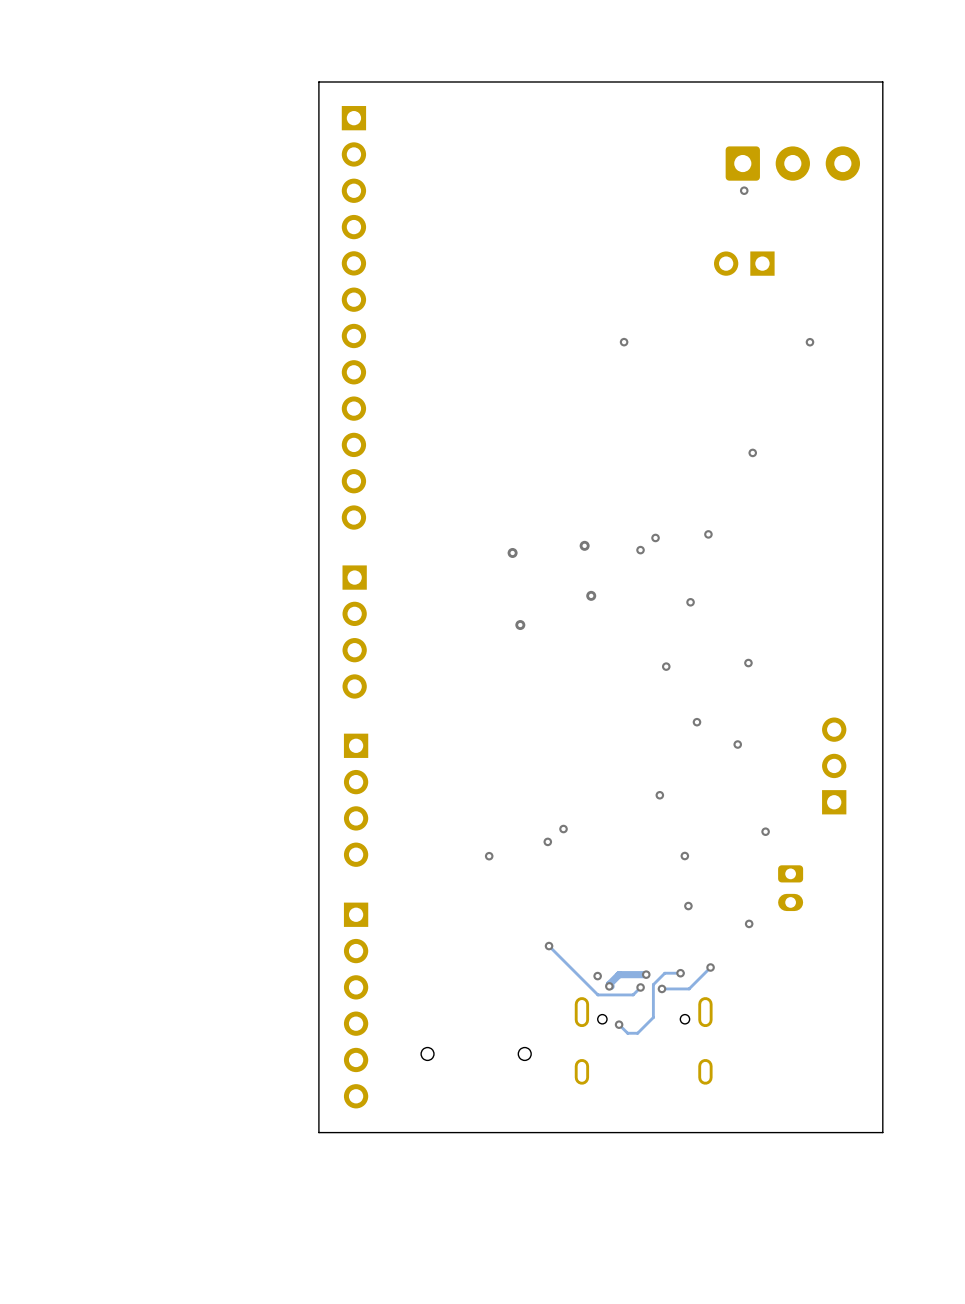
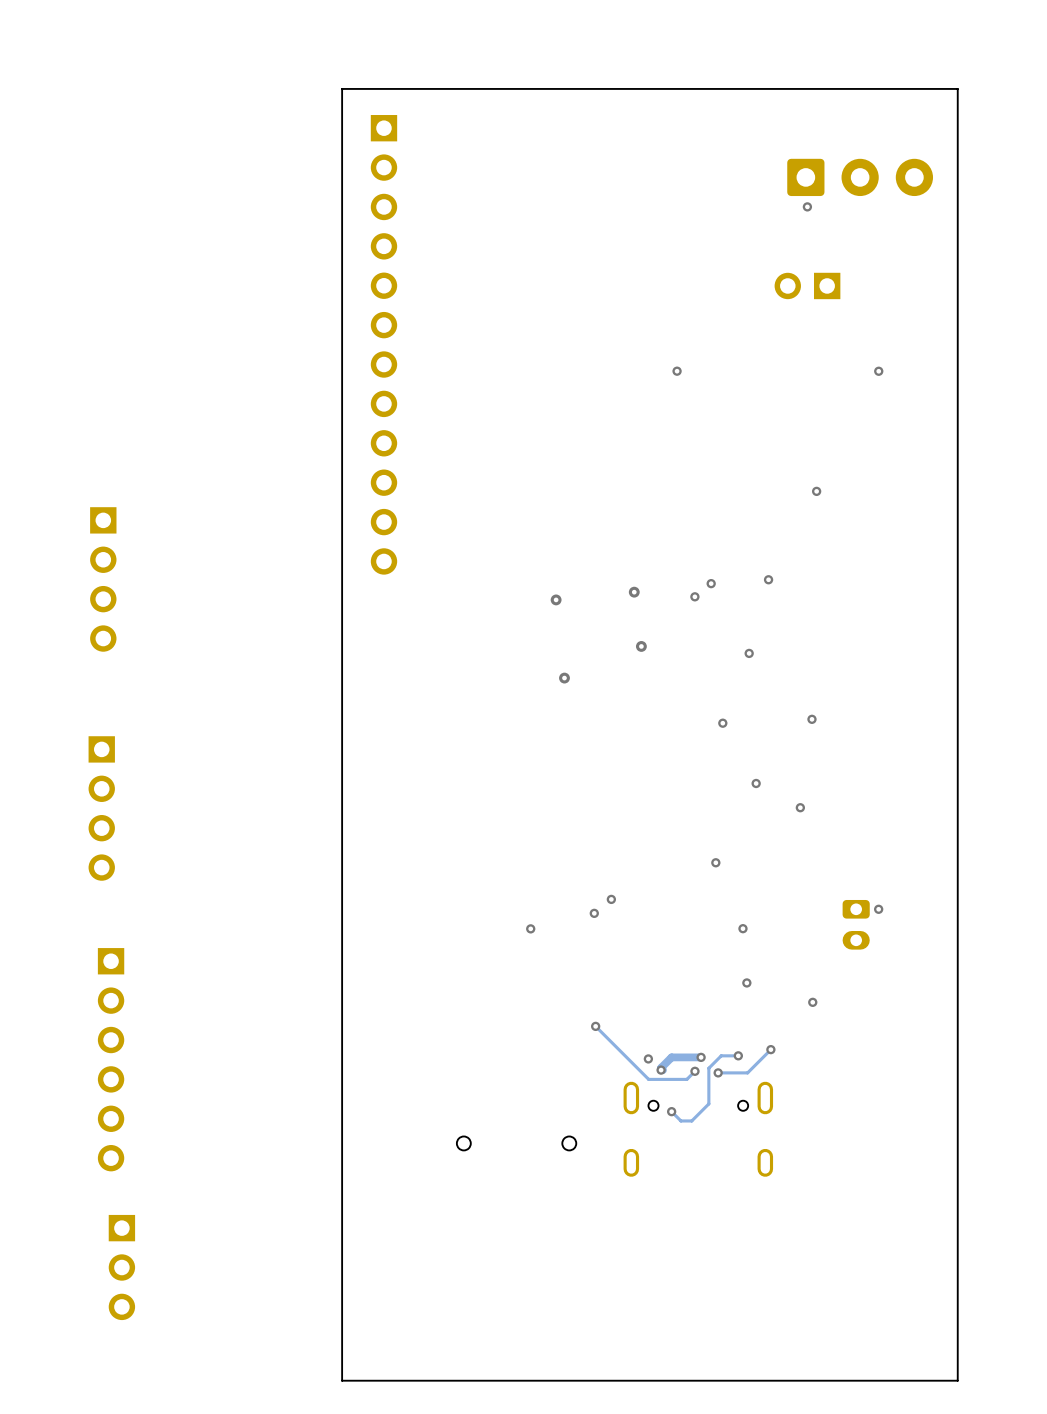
board edge: (318, 81) (318, 1132) (882, 1132) -> (345, 88) (342, 88) (342, 1380) (957, 1380) (957, 1228)
part: none -> (103, 579)
part: (354, 632) -> none
part: none -> (101, 808)
part: (834, 765) -> none
part: (356, 800) -> none
via position: (765, 831) -> (878, 909)
part position: (790, 888) -> (856, 924)
part position: (356, 1005) -> (111, 1059)
part: none -> (121, 1267)

